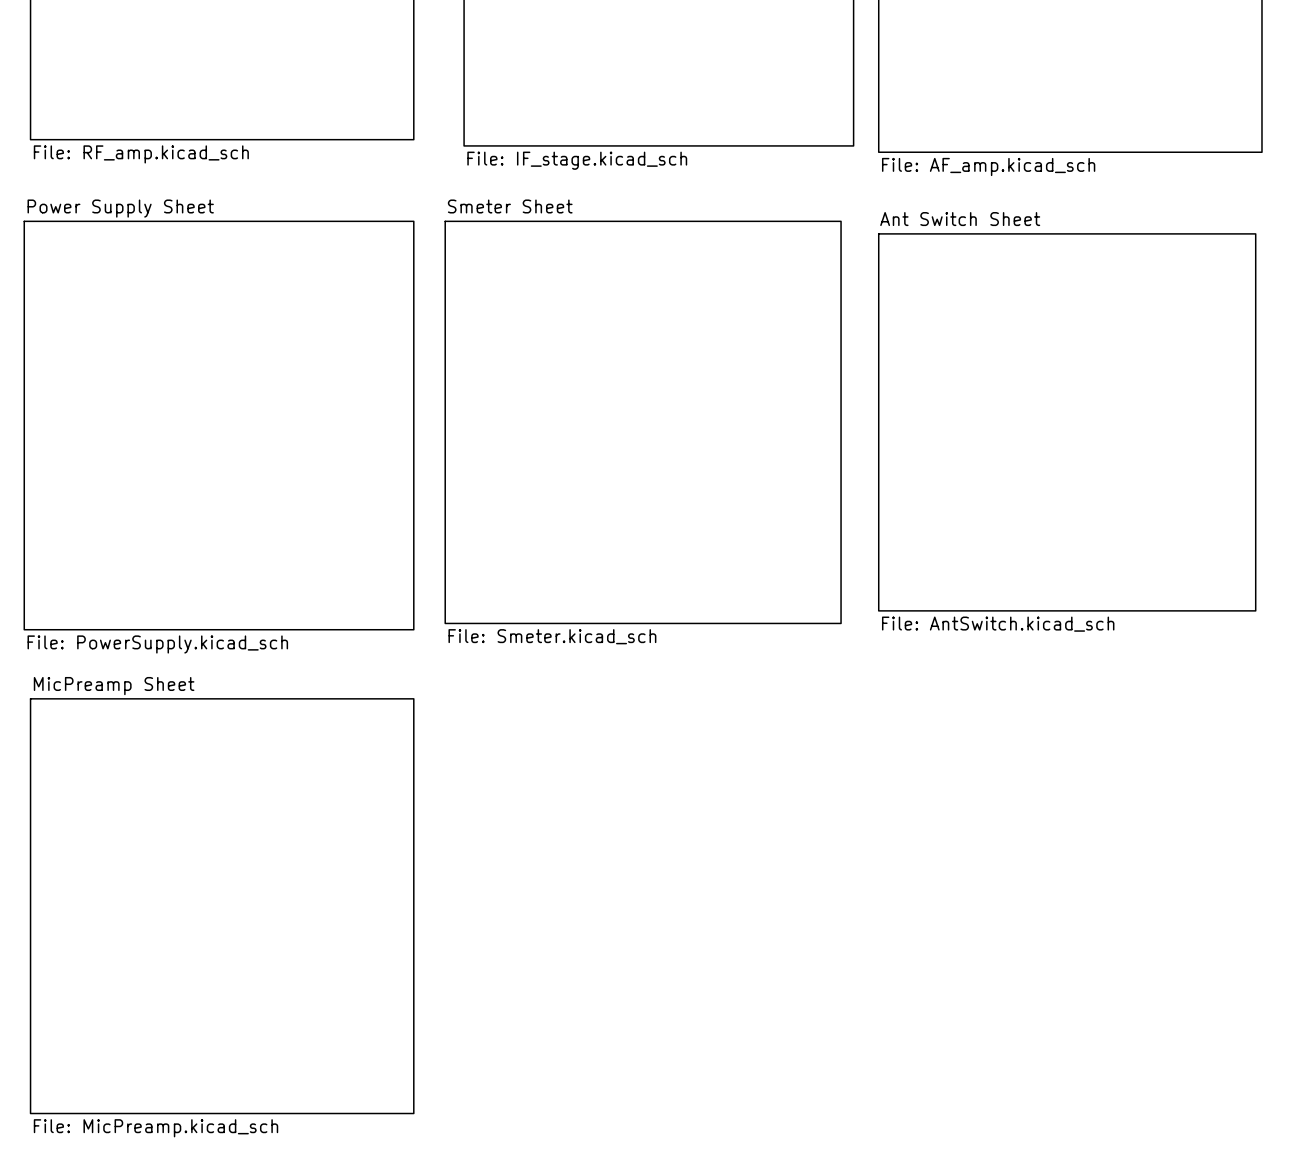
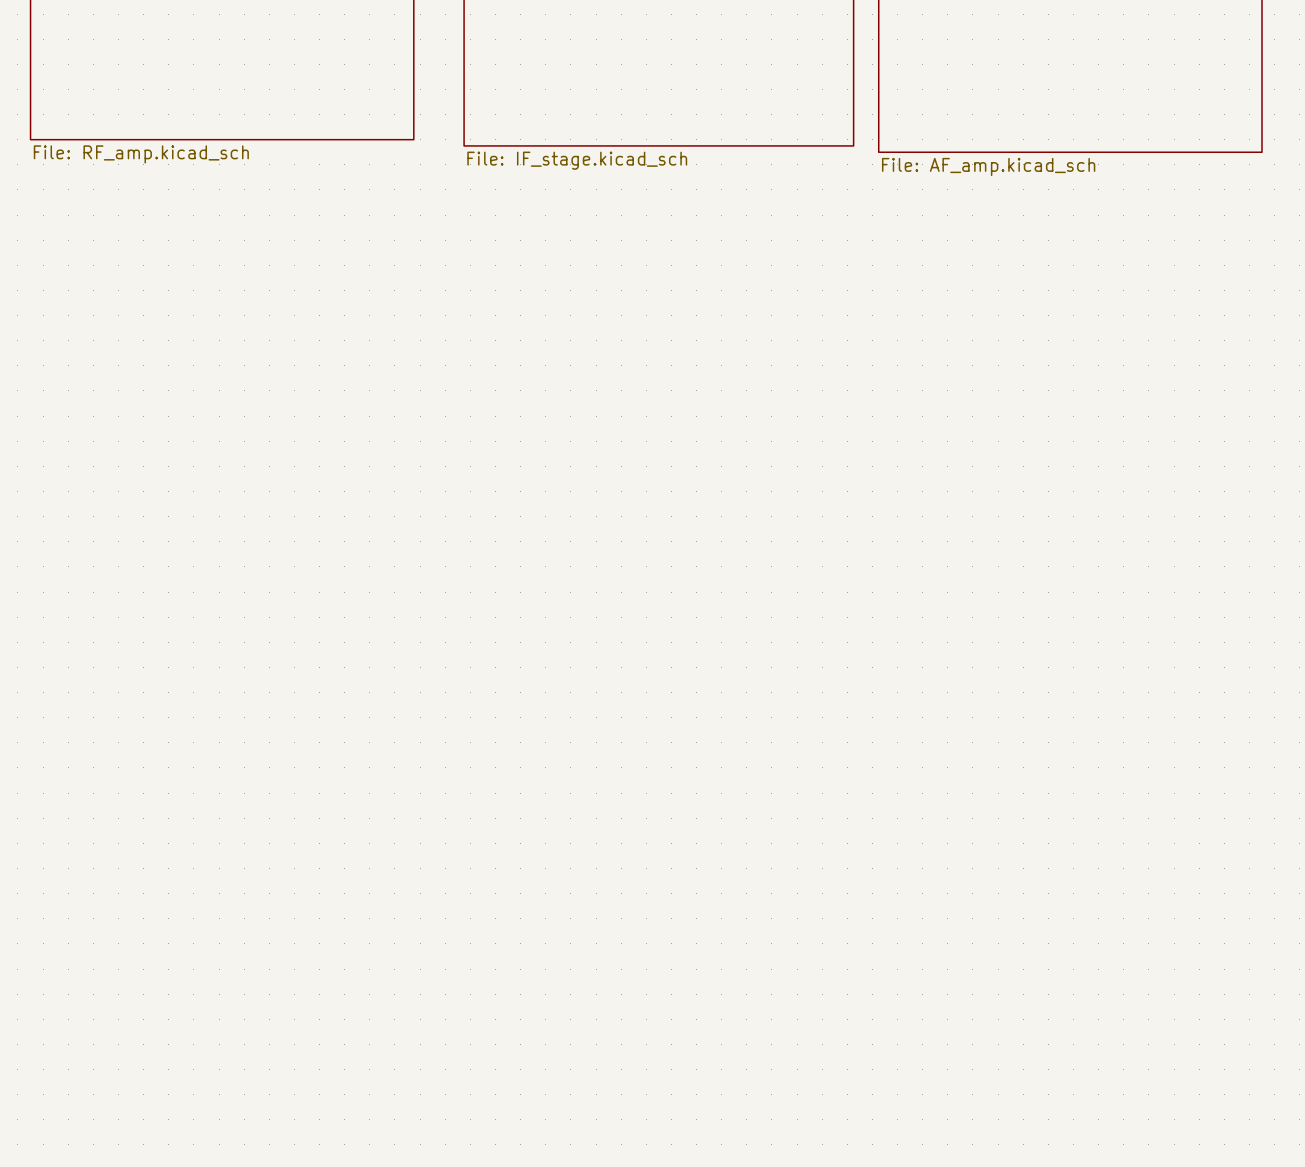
sheet Smeter Sheet: File: Smeter.kicad_sch (643, 422) -> none
sheet Ant Switch Sheet: File: AntSwitch.kicad_sch (1067, 422) -> none
sheet Power Supply Sheet: File: PowerSupply.kicad_sch (219, 425) -> none
sheet MicPreamp Sheet: File: MicPreamp.kicad_sch (222, 906) -> none

